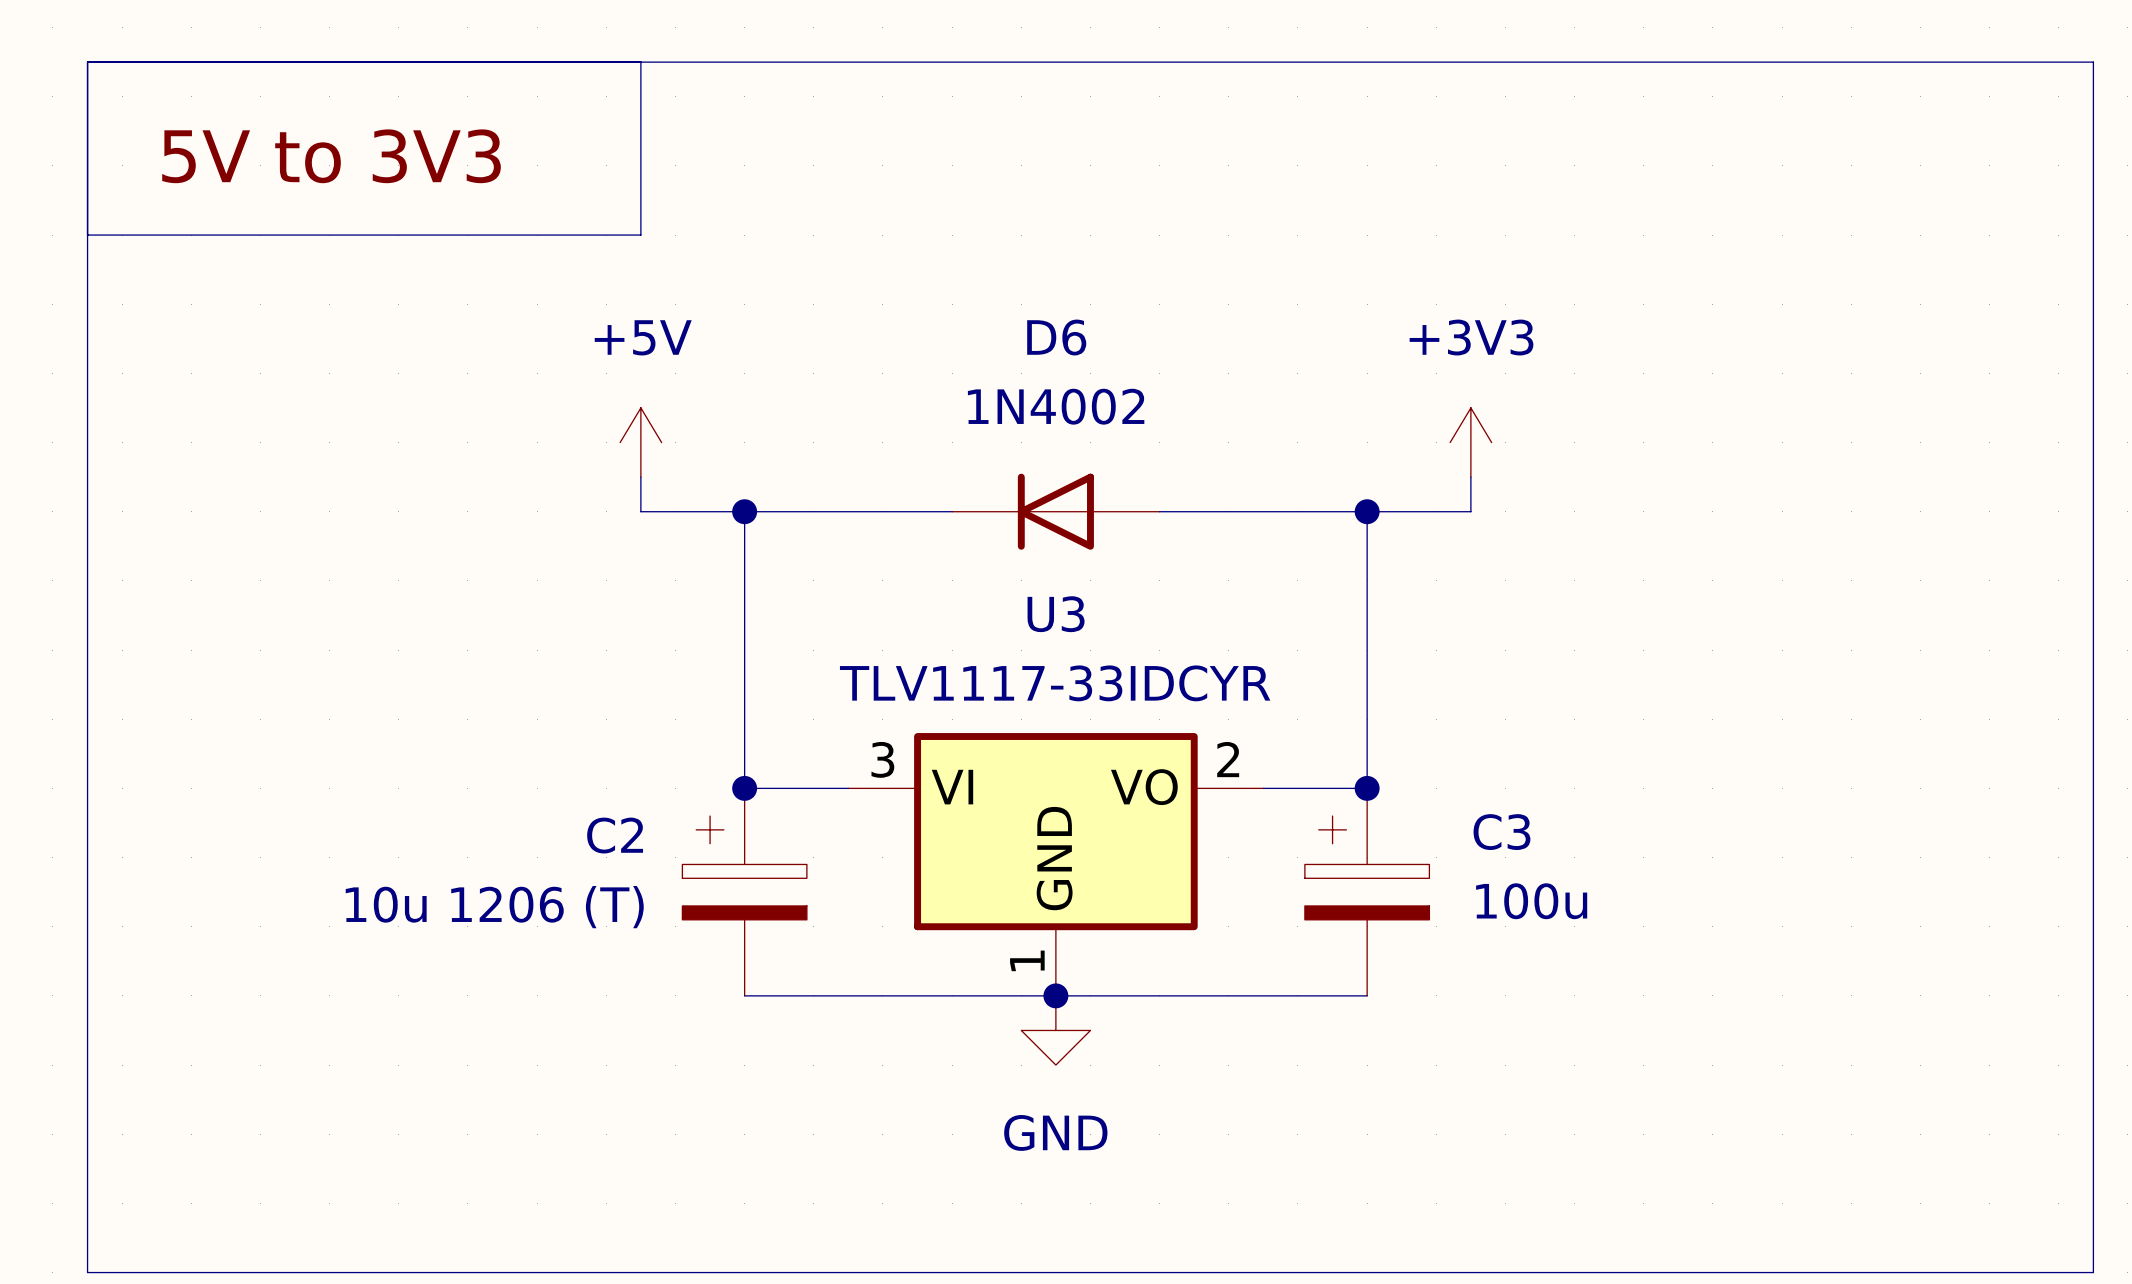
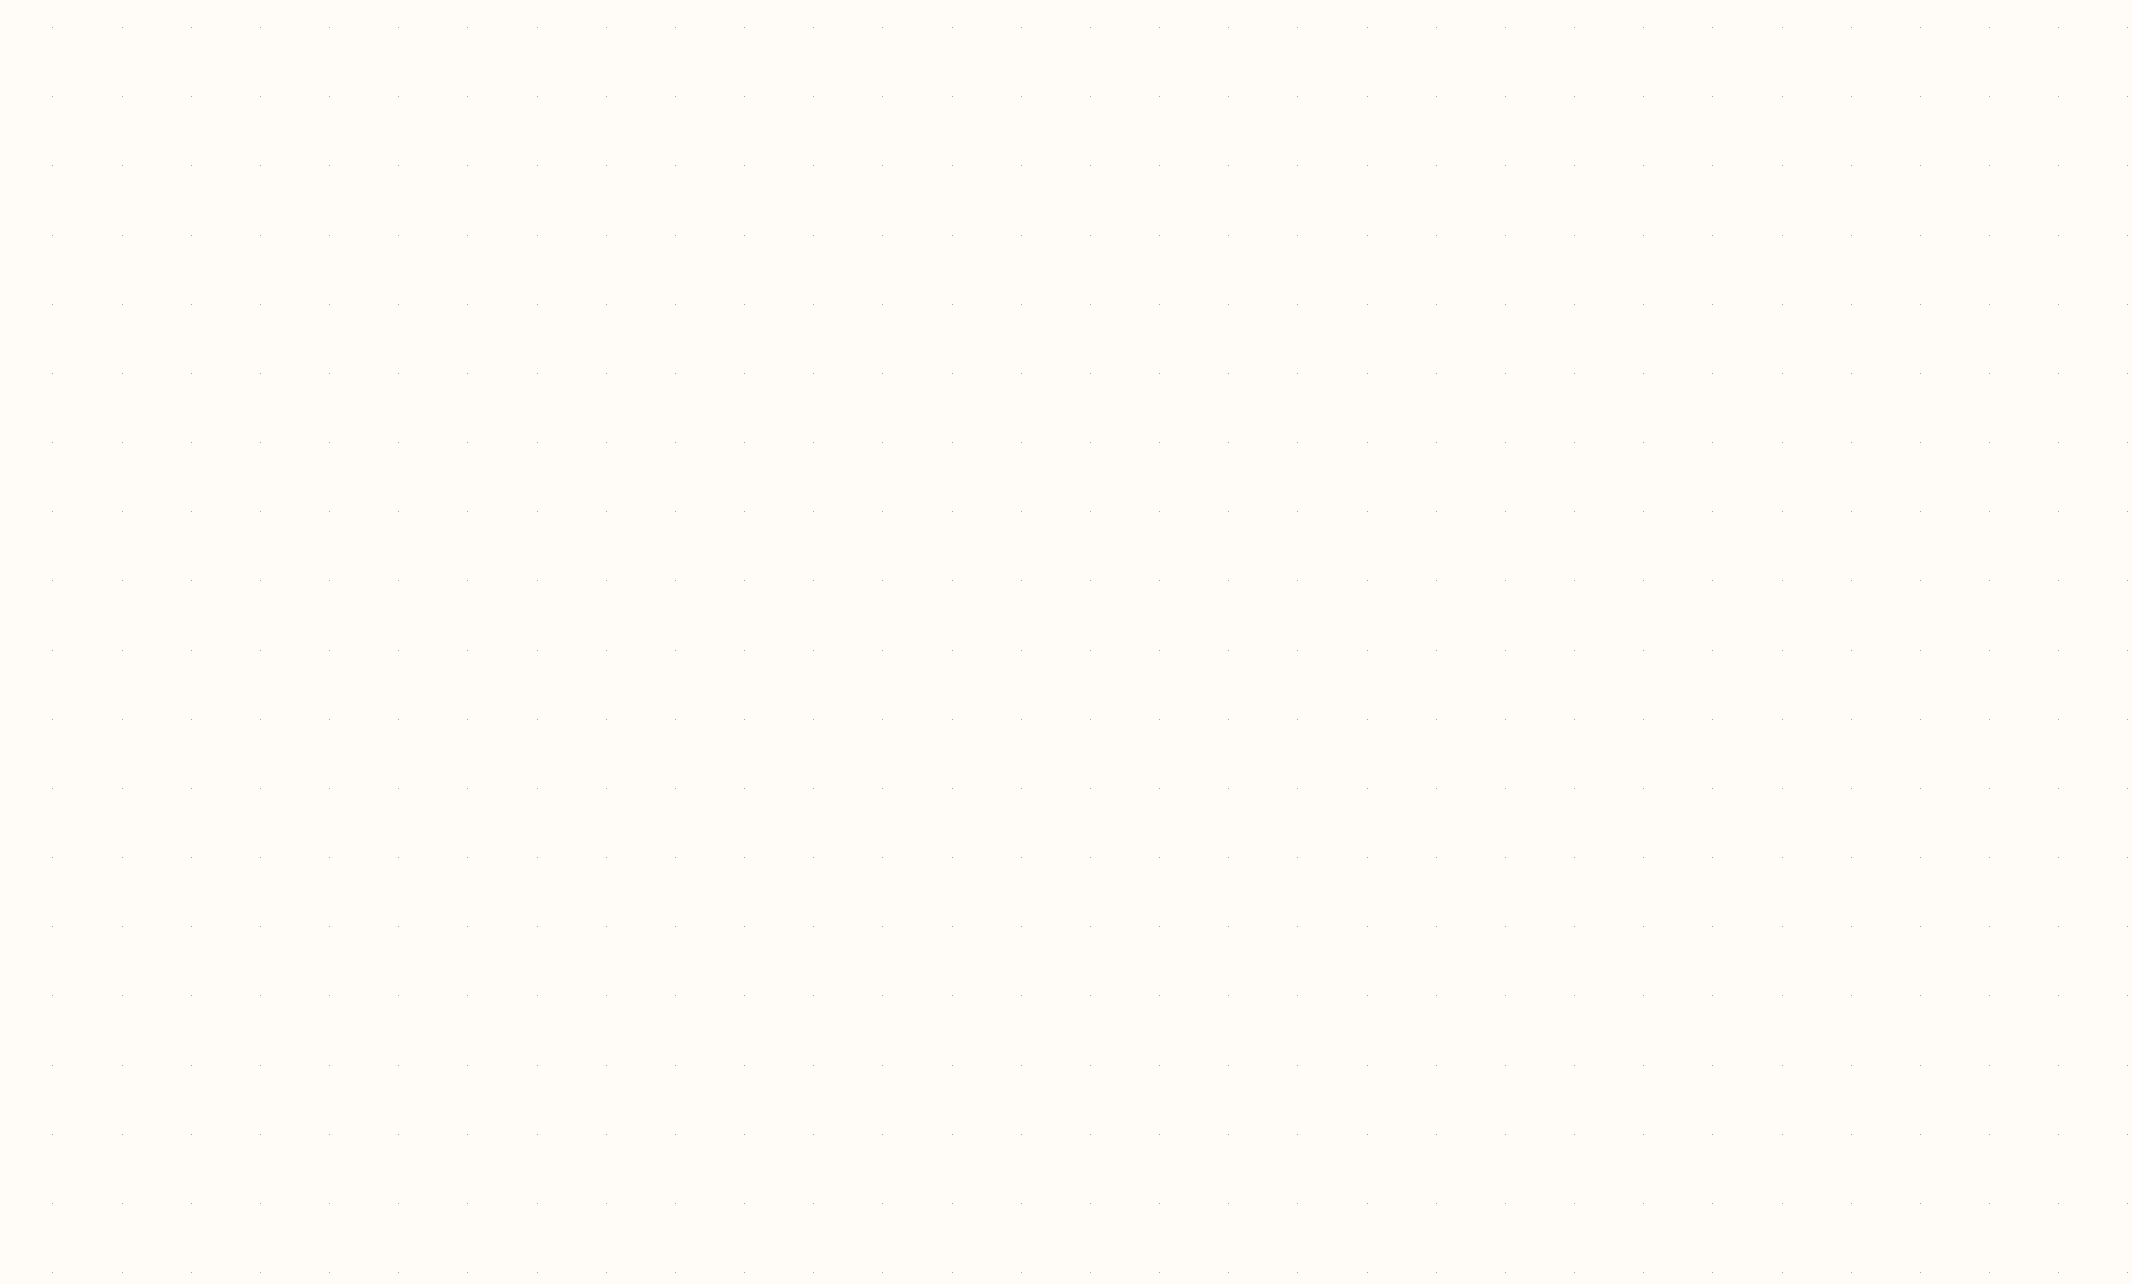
line: (87, 62) (2093, 62) (2093, 1272) (87, 1272) (87, 62) -> none
line: (640, 62) (640, 235) (87, 235) -> none
label: 5V to 3V3 (331, 156) -> none
power symbol: +5V (640, 442) -> none
power symbol: +3V3 (1470, 442) -> none
wire: (640, 477) (640, 511) (952, 511) -> none
wire: (1470, 477) (1470, 511) (1159, 511) -> none
wire: (744, 511) (744, 788) (848, 788) -> none
junction: (744, 511) -> none
D6: 1N4002 (1055, 511) -> none
wire: (1367, 511) (1367, 788) (1263, 788) -> none
junction: (1367, 511) -> none
junction: (744, 788) -> none
junction: (1367, 788) -> none
U3: TLV1117-33IDCYR (1055, 864) -> none
C2: 10u 1206 (T) (744, 892) -> none
C3: 100u (1367, 892) -> none
wire: (744, 995) (1367, 995) -> none
junction: (1055, 995) -> none
power symbol: GND (1055, 1030) -> none

